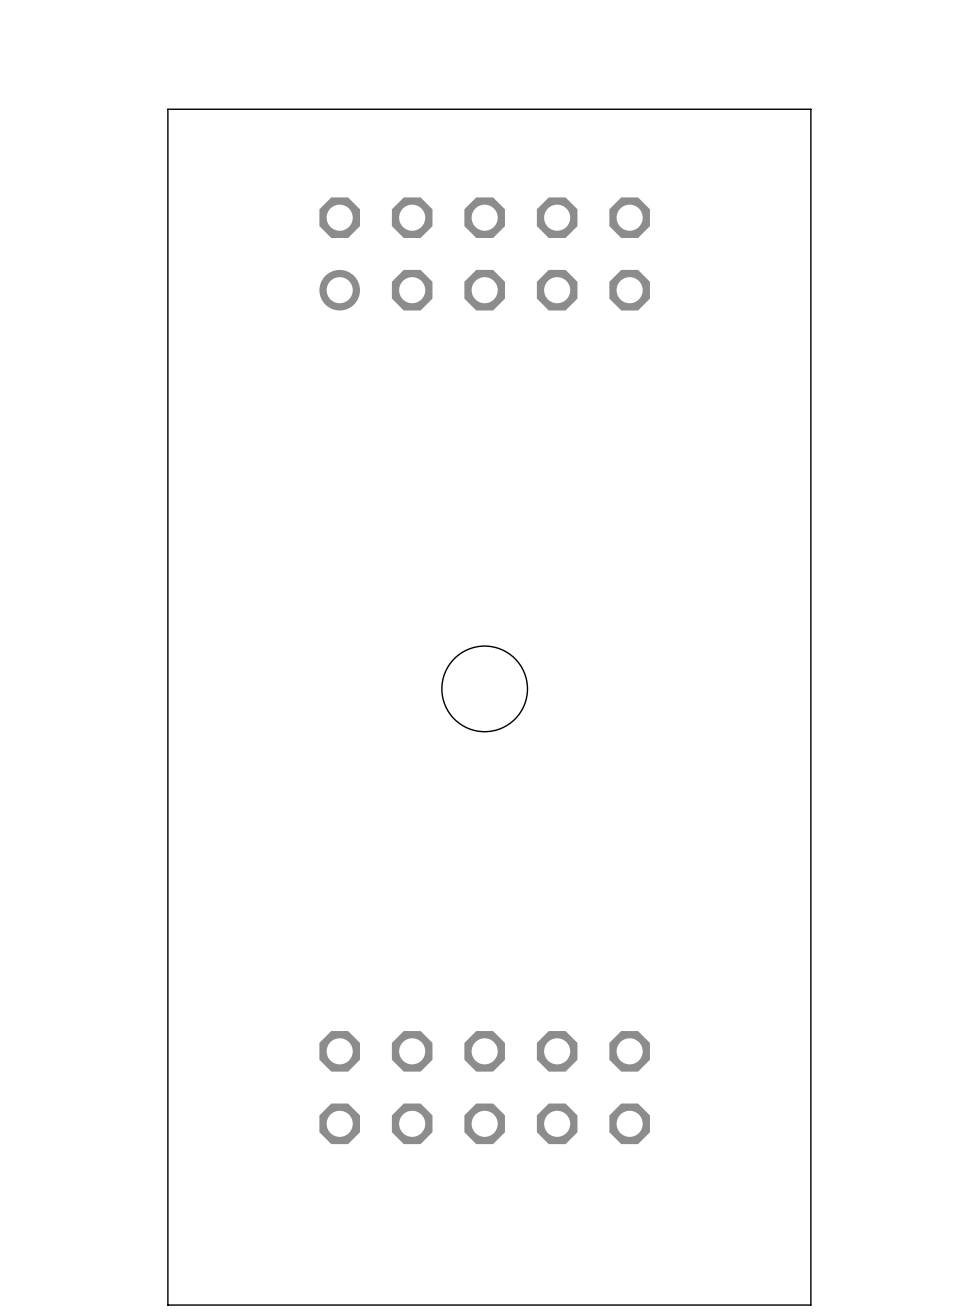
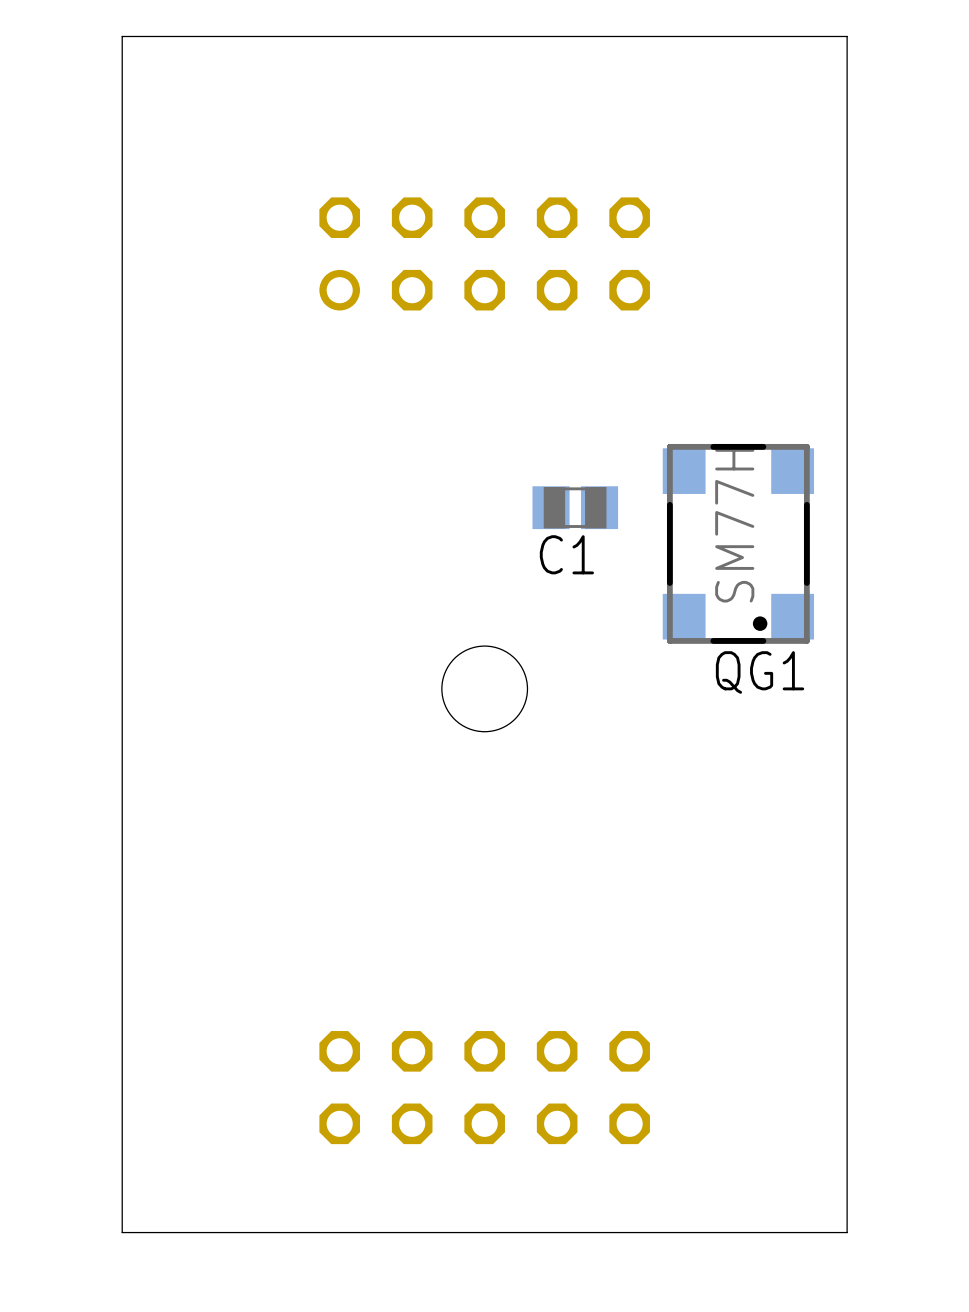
board edge: (810, 109) (167, 109) (167, 1305) (810, 1305) (810, 109) -> (847, 36) (847, 1232) (122, 1232) (122, 36) (847, 36)
C1: none -> (575, 507)
QG1: none -> SM77H (738, 543)

